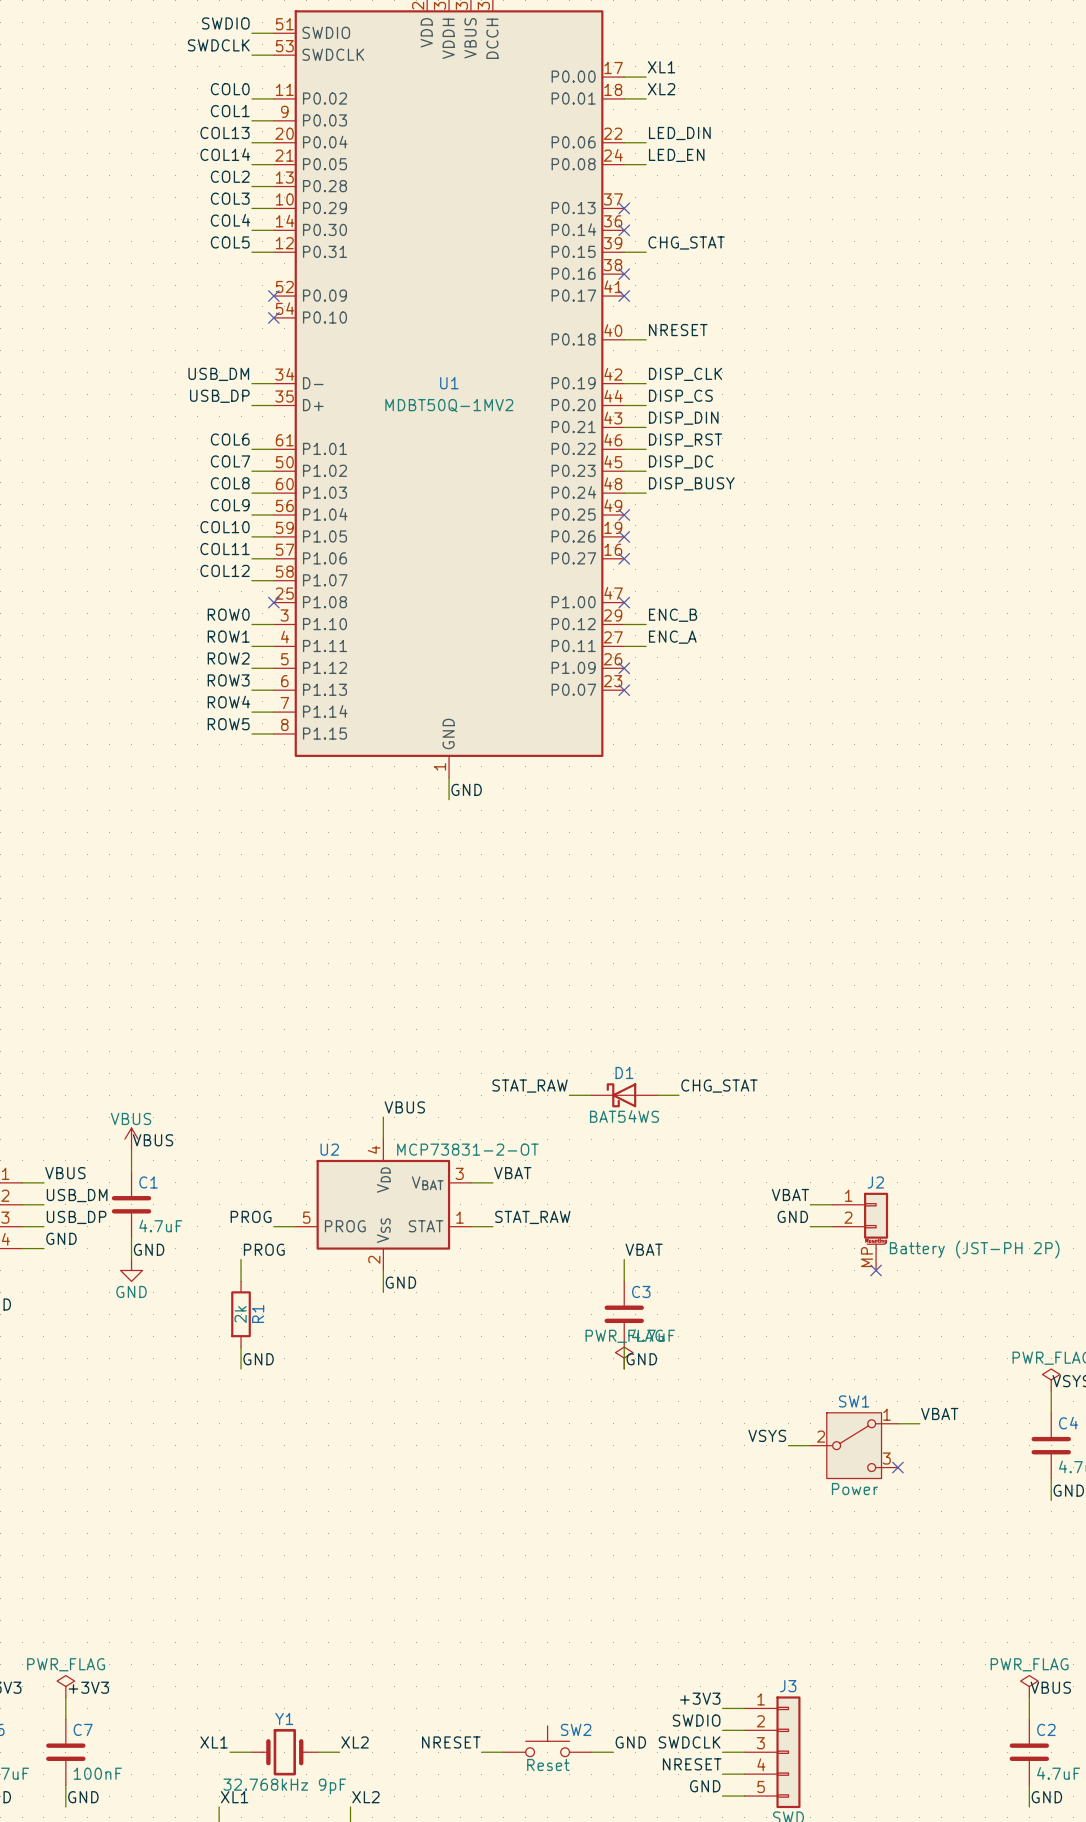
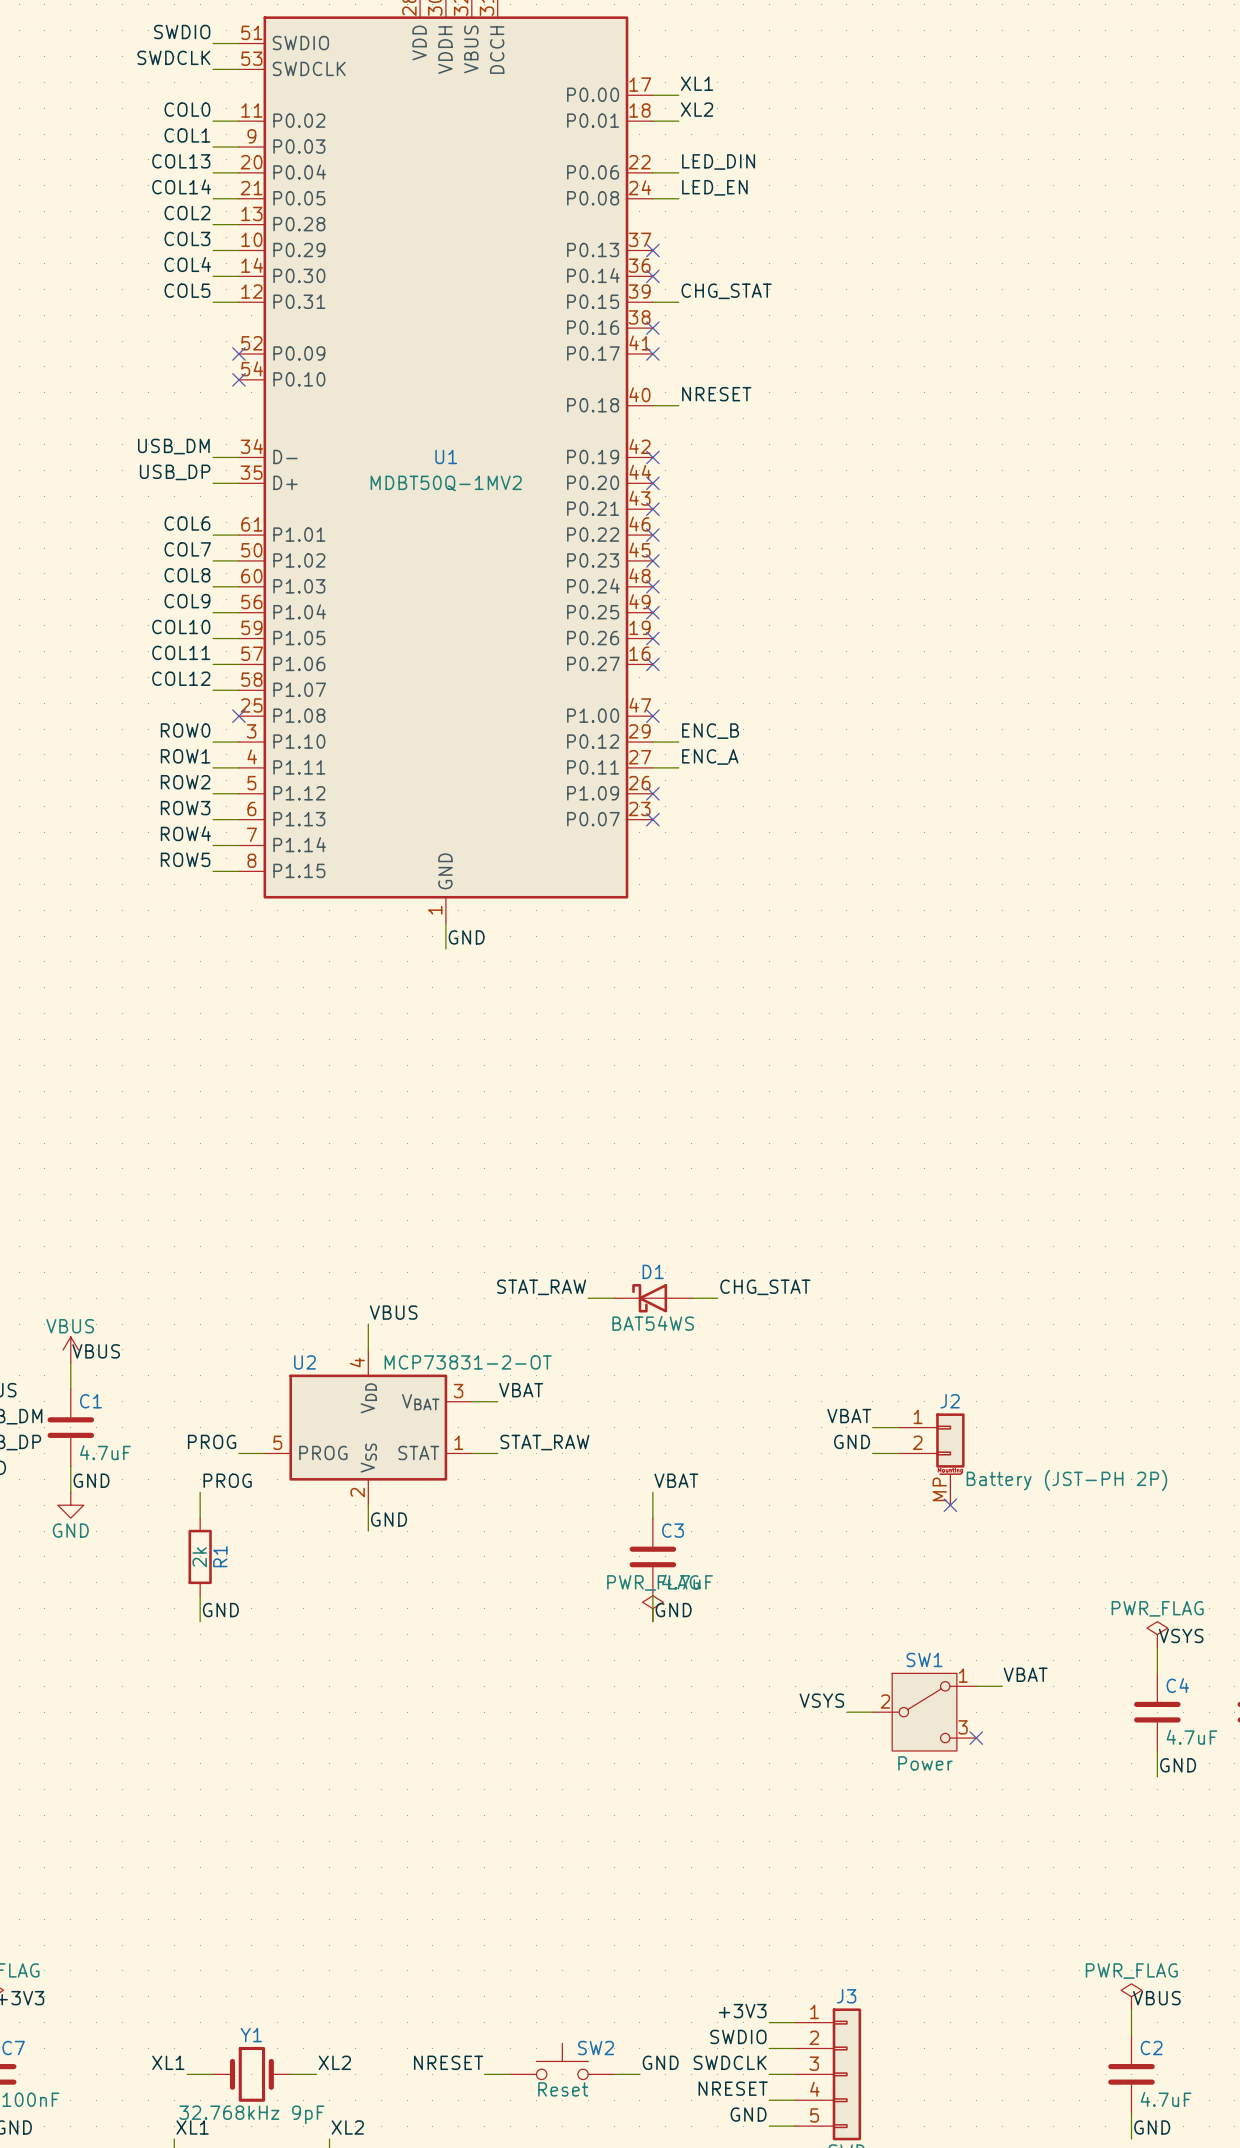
label: DISP_CLK (685, 374) -> none
wire: (624, 383) (646, 383) -> none
no-connect mark: none -> (652, 457)
label: DISP_CS (680, 396) -> none
wire: (624, 405) (646, 405) -> none
no-connect mark: none -> (652, 483)
label: DISP_DIN (683, 418) -> none
wire: (624, 427) (646, 427) -> none
no-connect mark: none -> (652, 509)
label: DISP_RST (685, 440) -> none
wire: (624, 449) (646, 449) -> none
no-connect mark: none -> (652, 535)
label: DISP_DC (681, 461) -> none
wire: (624, 471) (646, 471) -> none
no-connect mark: none -> (652, 560)
label: DISP_BUSY (691, 483) -> none
wire: (624, 493) (646, 493) -> none
no-connect mark: none -> (652, 586)

